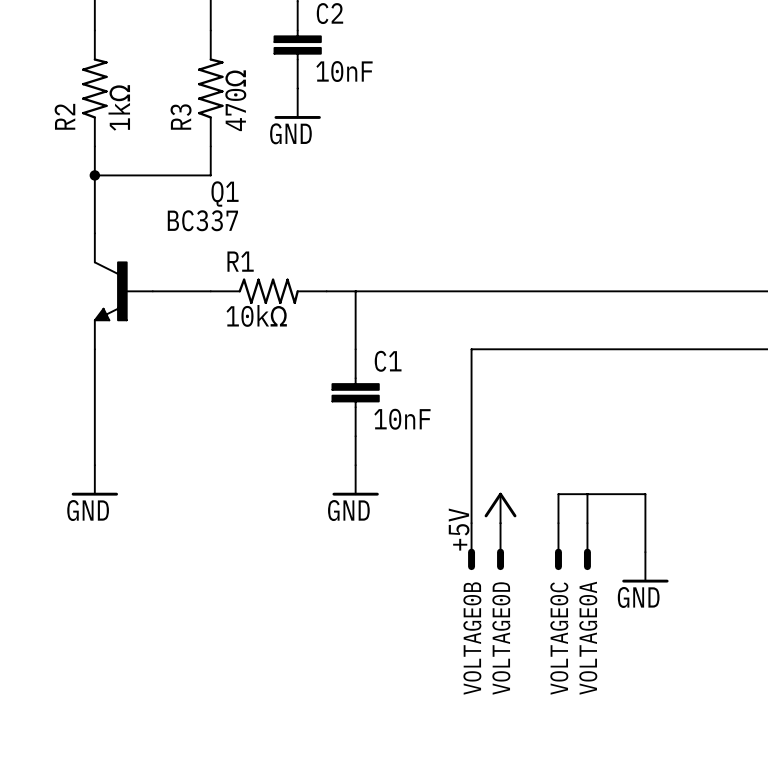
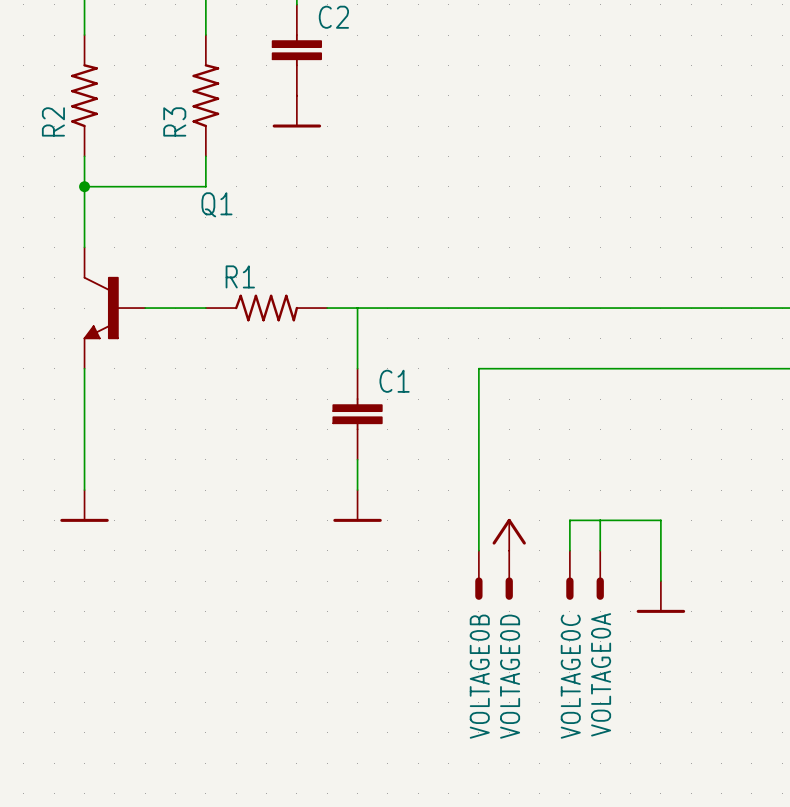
C2 value: 10nF (344, 71) -> none
R3 value: 470Ω (235, 100) -> none
R2 value: 1kΩ (119, 107) -> none
power symbol text: GND (290, 133) -> none
Q1 value: BC337 (202, 220) -> none
R1 value: 10kΩ (256, 315) -> none
C1 value: 10nF (402, 419) -> none
power symbol text: GND (88, 510) -> none
power symbol text: GND (348, 510) -> none
power symbol text: +5V (459, 529) -> none
power symbol text: GND (638, 597) -> none

